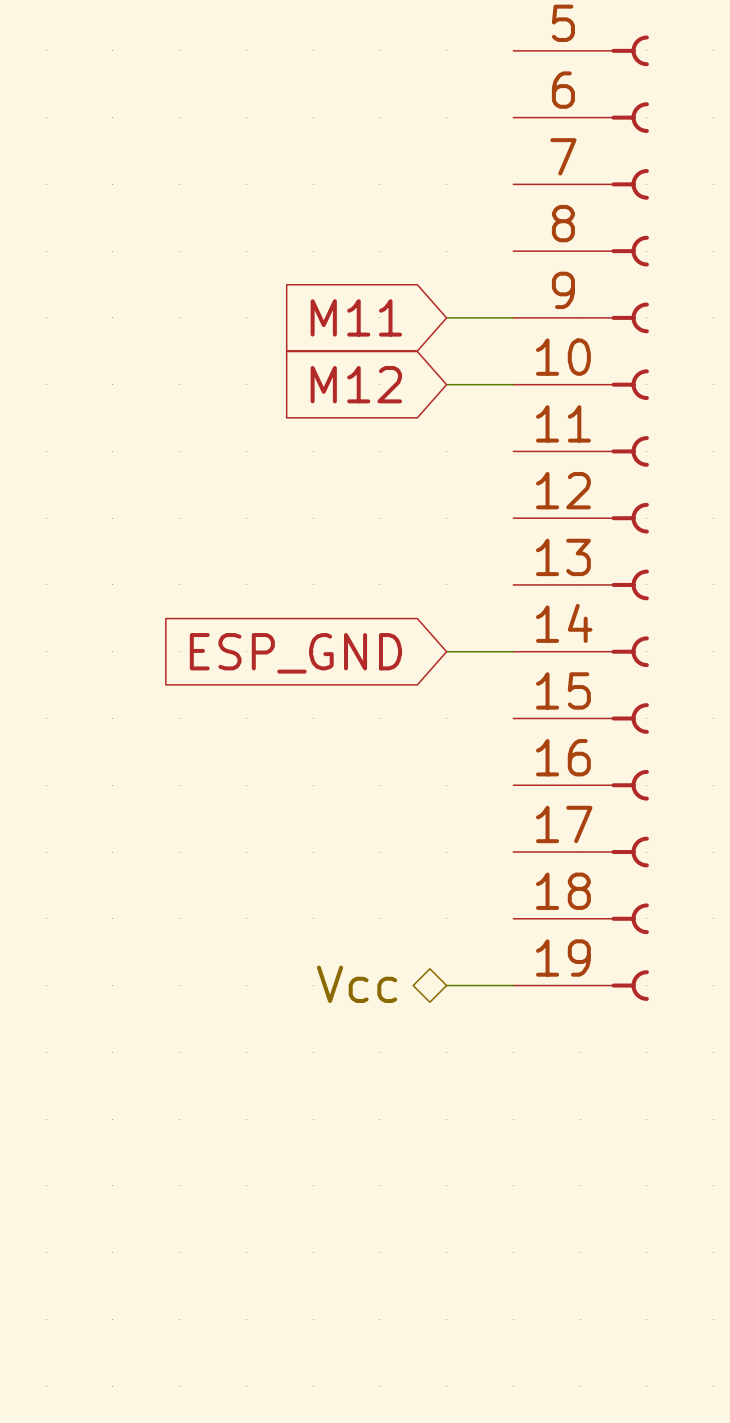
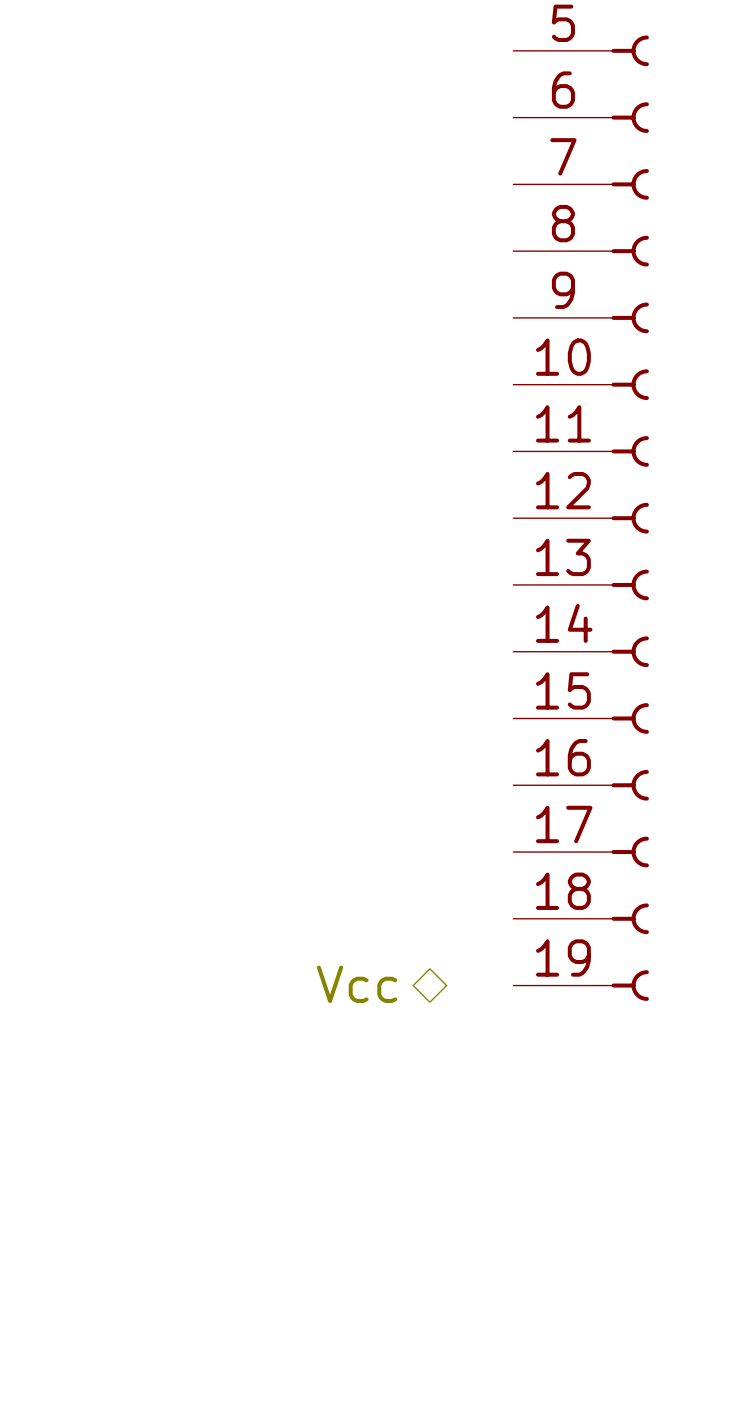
global label: M11 (356, 317) -> none
wire: (446, 317) (513, 317) -> none
global label: M12 (356, 384) -> none
wire: (446, 384) (513, 384) -> none
wire: (446, 651) (513, 651) -> none
global label: ESP_GND (295, 653) -> none
wire: (446, 985) (513, 985) -> none

